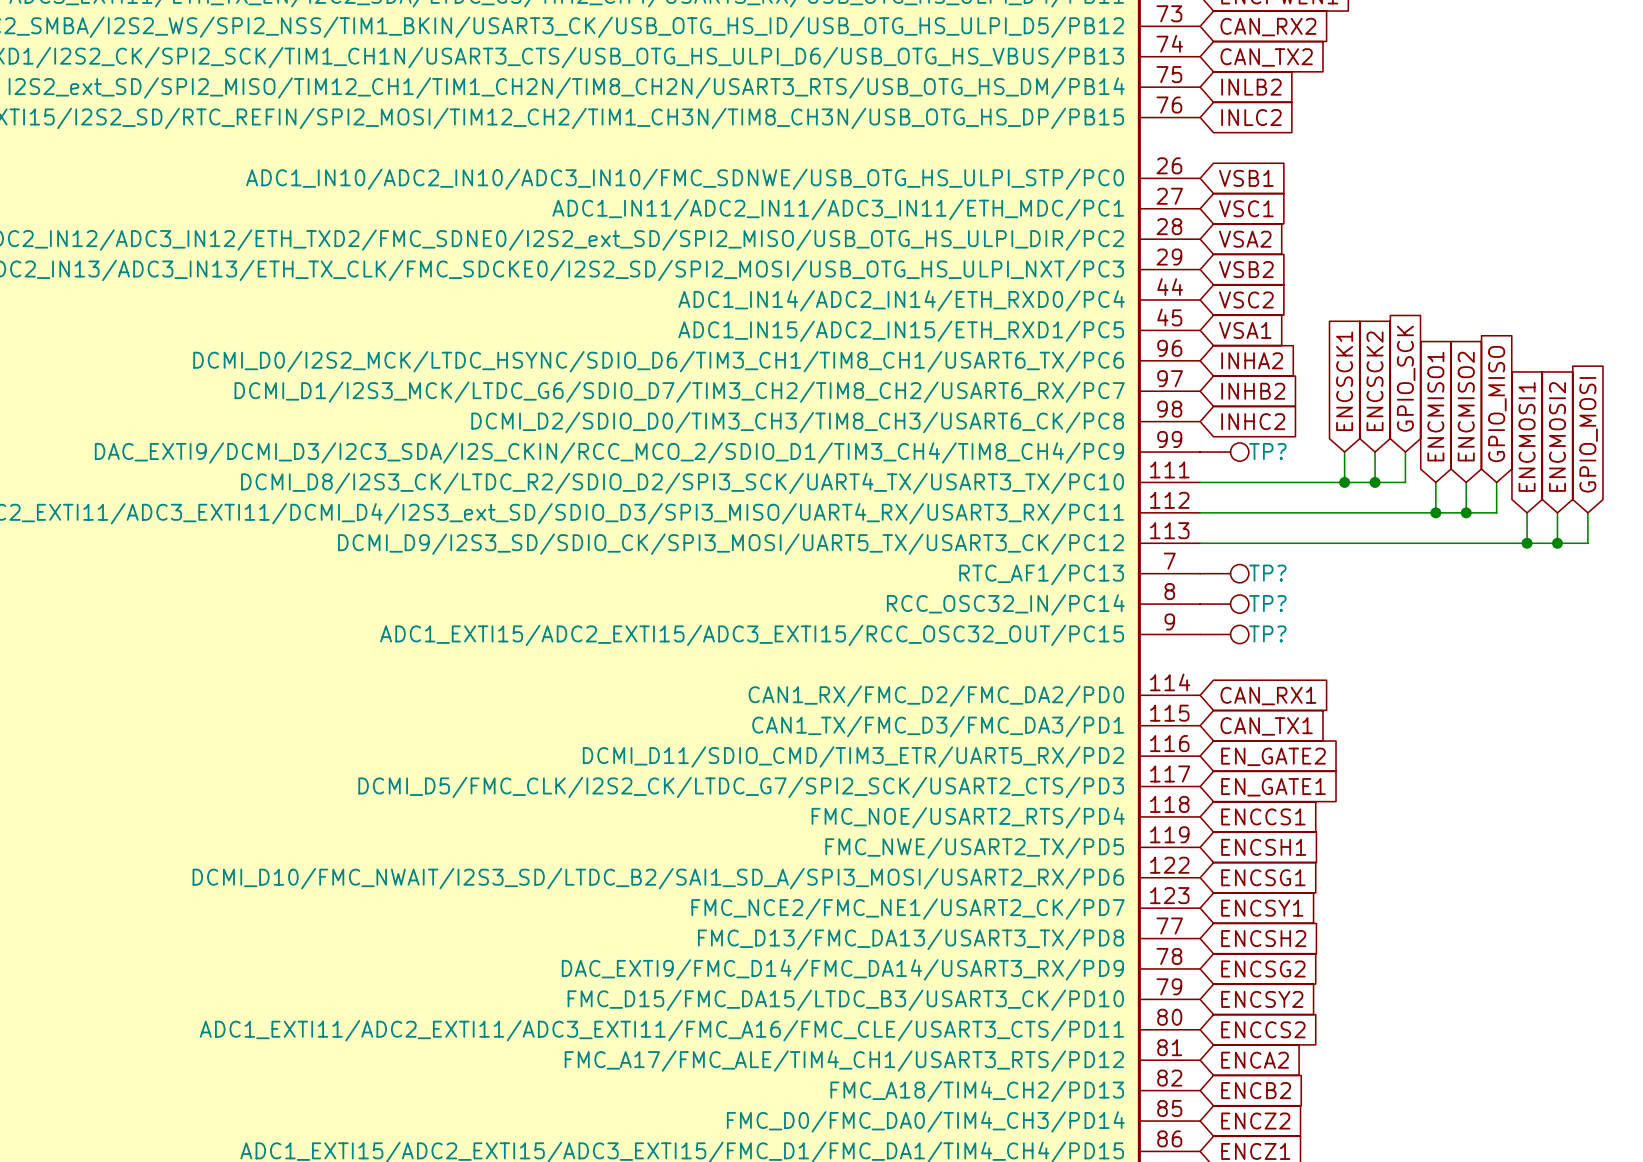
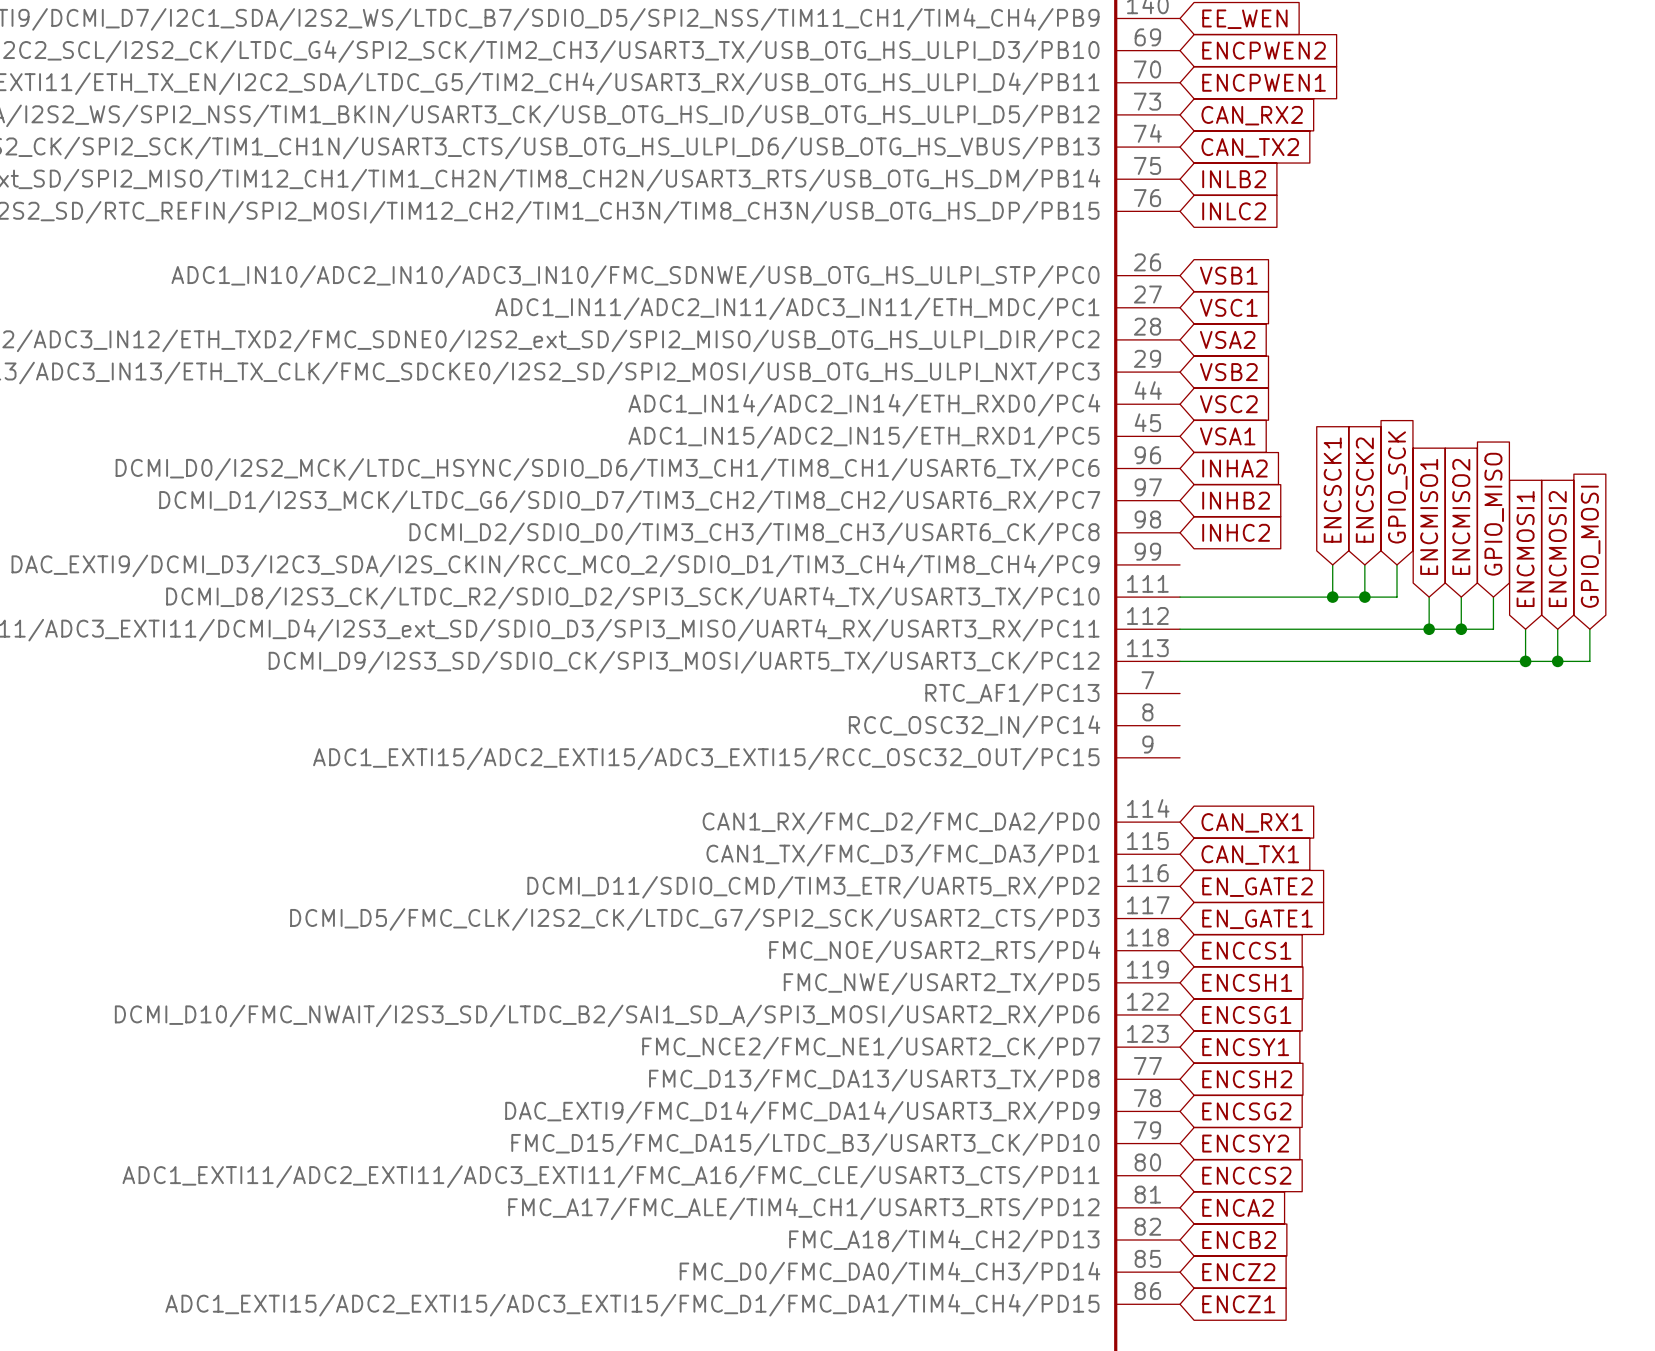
TP?: (1224, 452) -> none
TP?: (1224, 573) -> none
TP?: (1224, 604) -> none
TP?: (1224, 634) -> none

